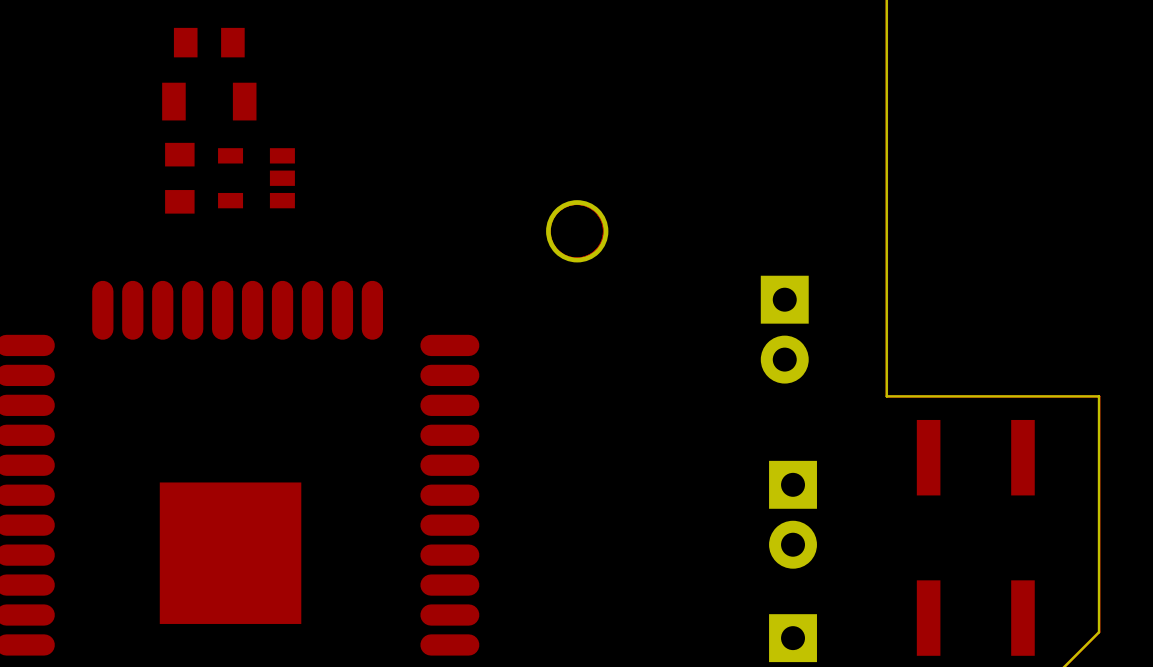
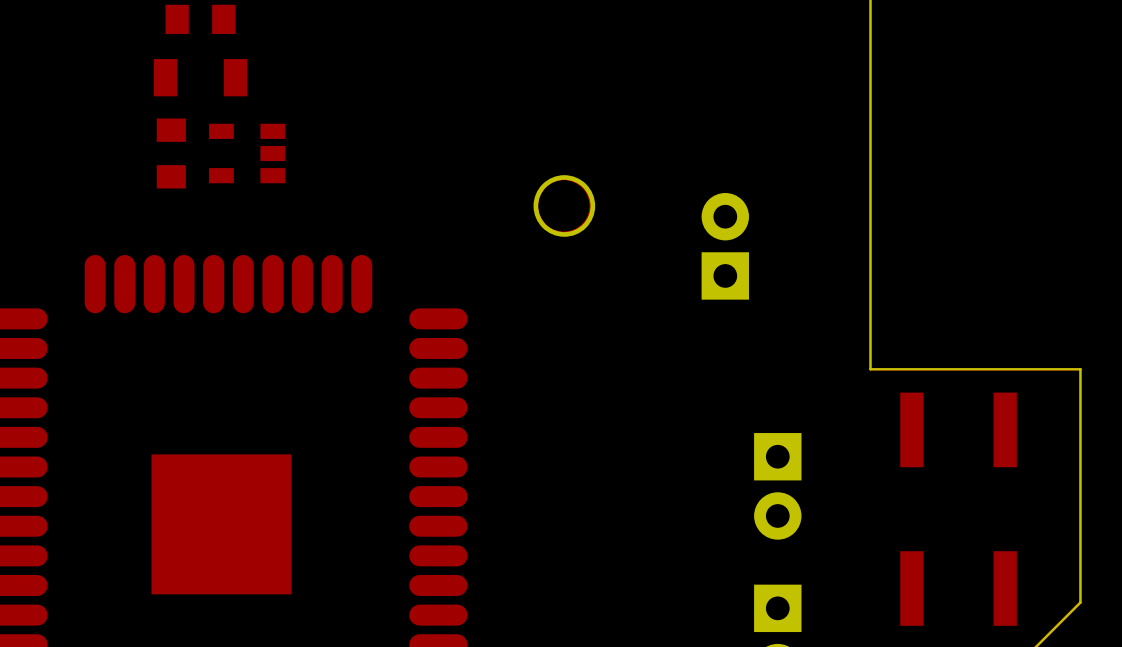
part rotation: 0° (784, 329) -> 180° (725, 246)
part position: (784, 329) -> (725, 246)

